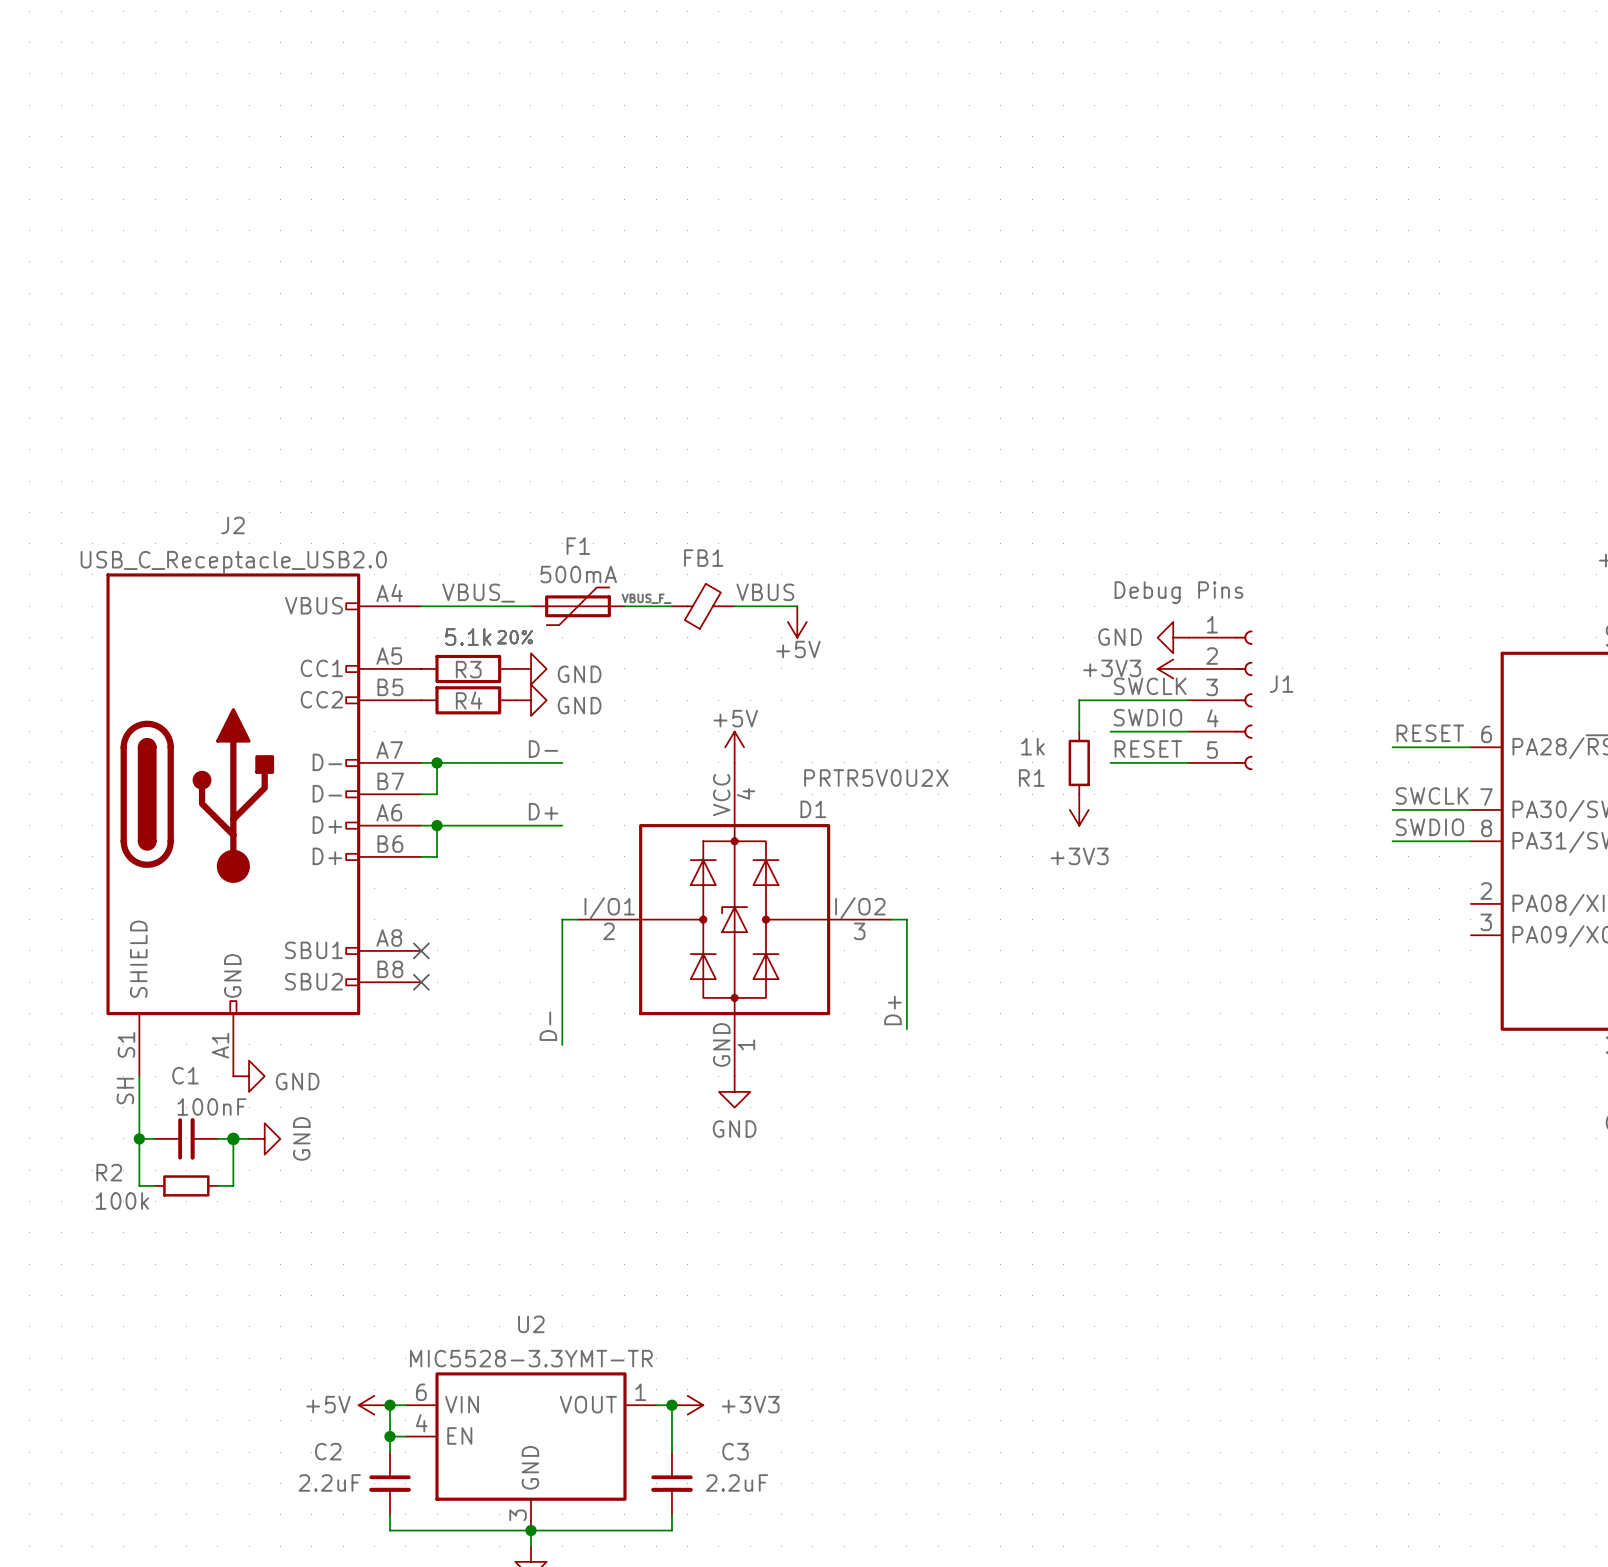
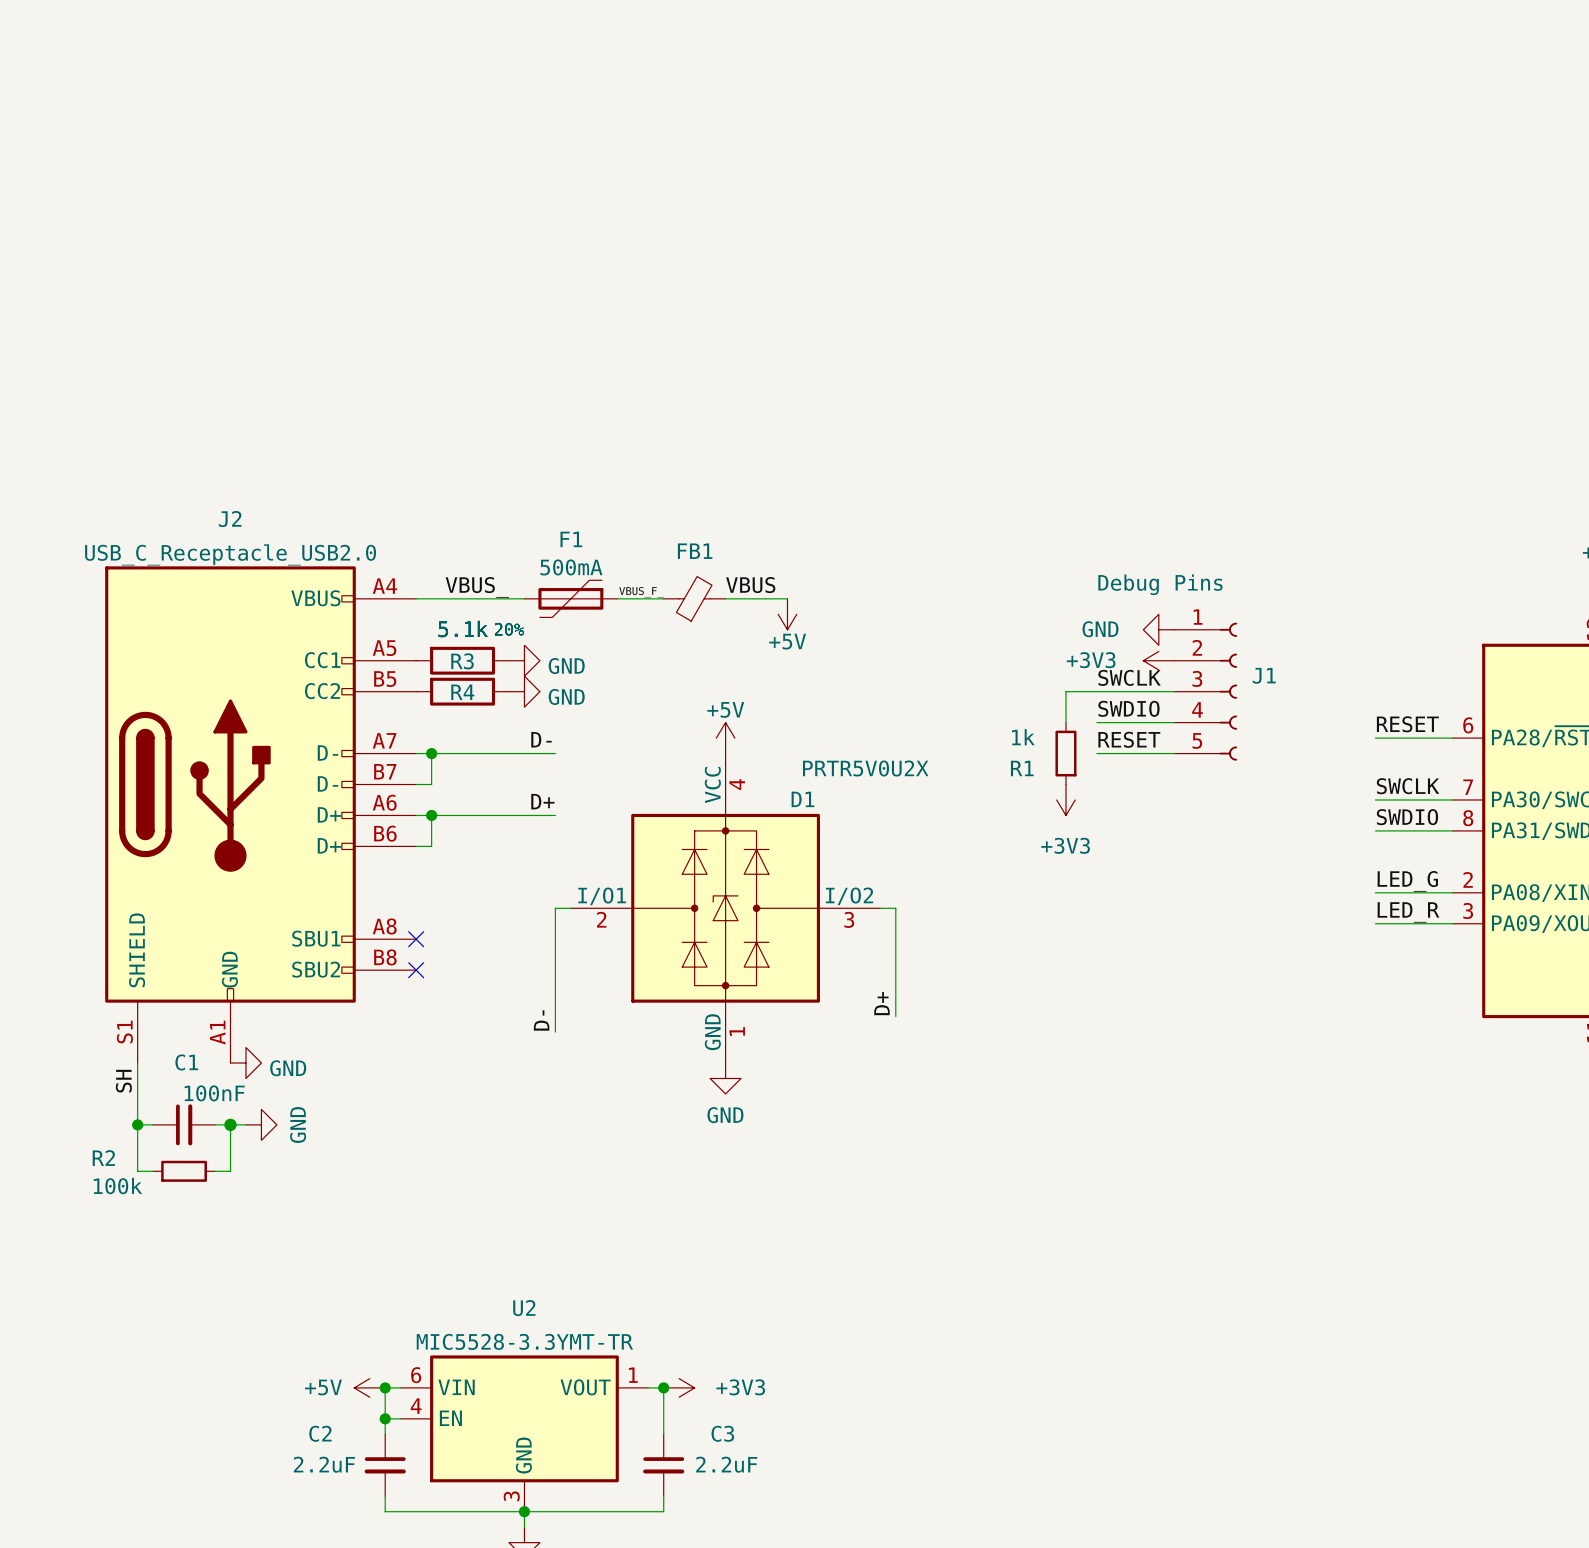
label: none -> LED_G (1407, 881)
wire: none -> (1375, 892) (1452, 892)
label: none -> LED_R (1408, 912)
wire: none -> (1375, 923) (1452, 923)

